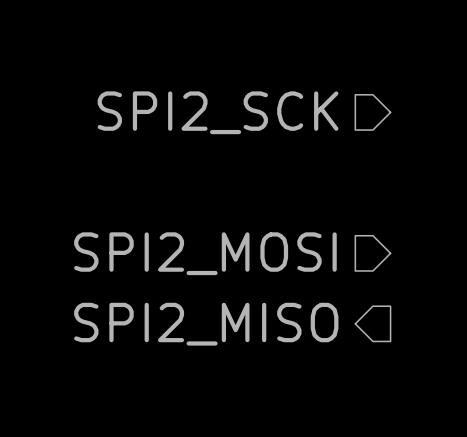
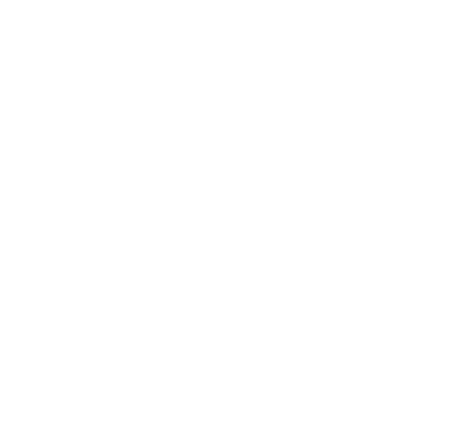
hierarchical label: SPI2_SCK (218, 112) -> none
hierarchical label: SPI2_MOSI (205, 253) -> none
hierarchical label: SPI2_MISO (206, 324) -> none

